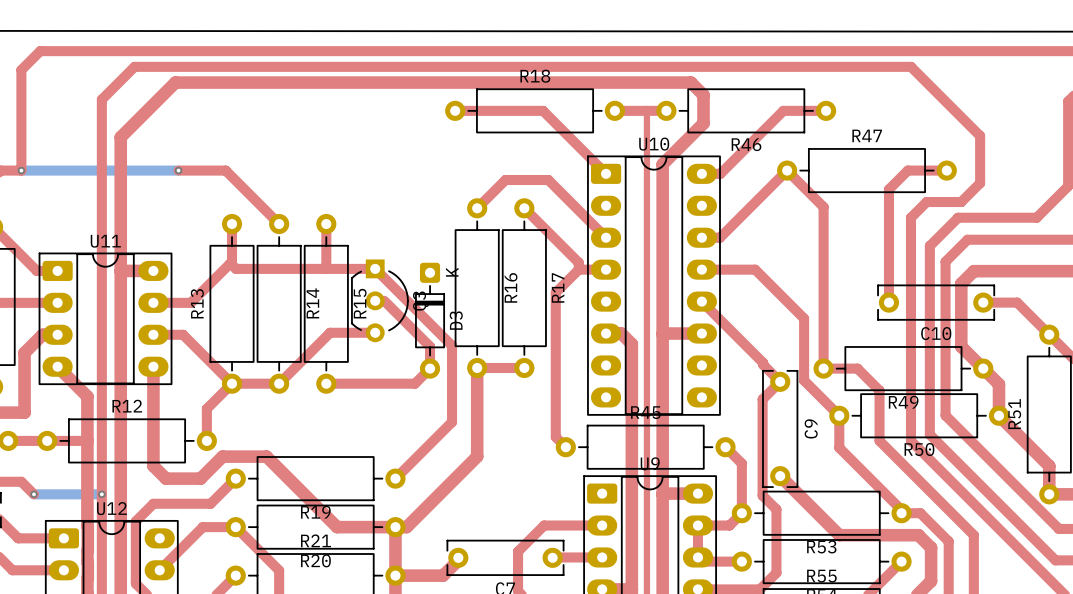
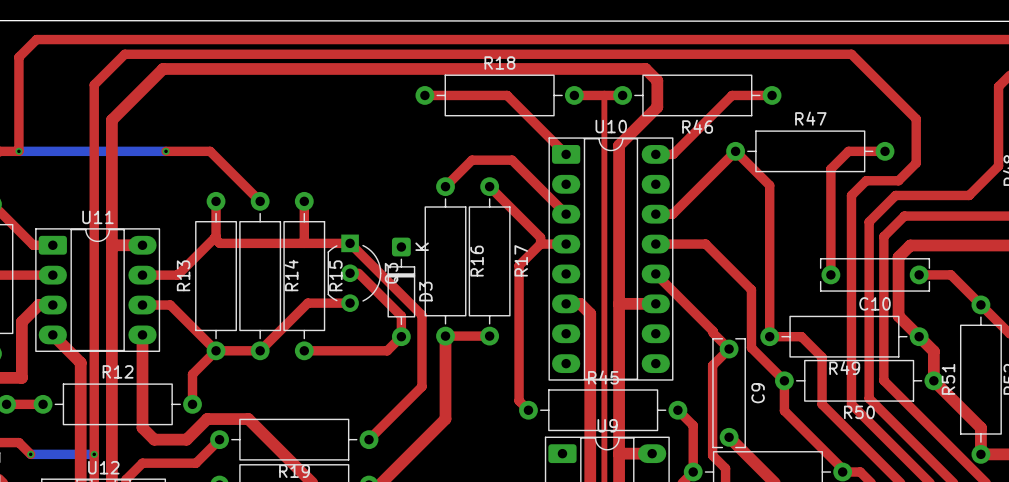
top track: (47, 440) (87, 440) -> none

